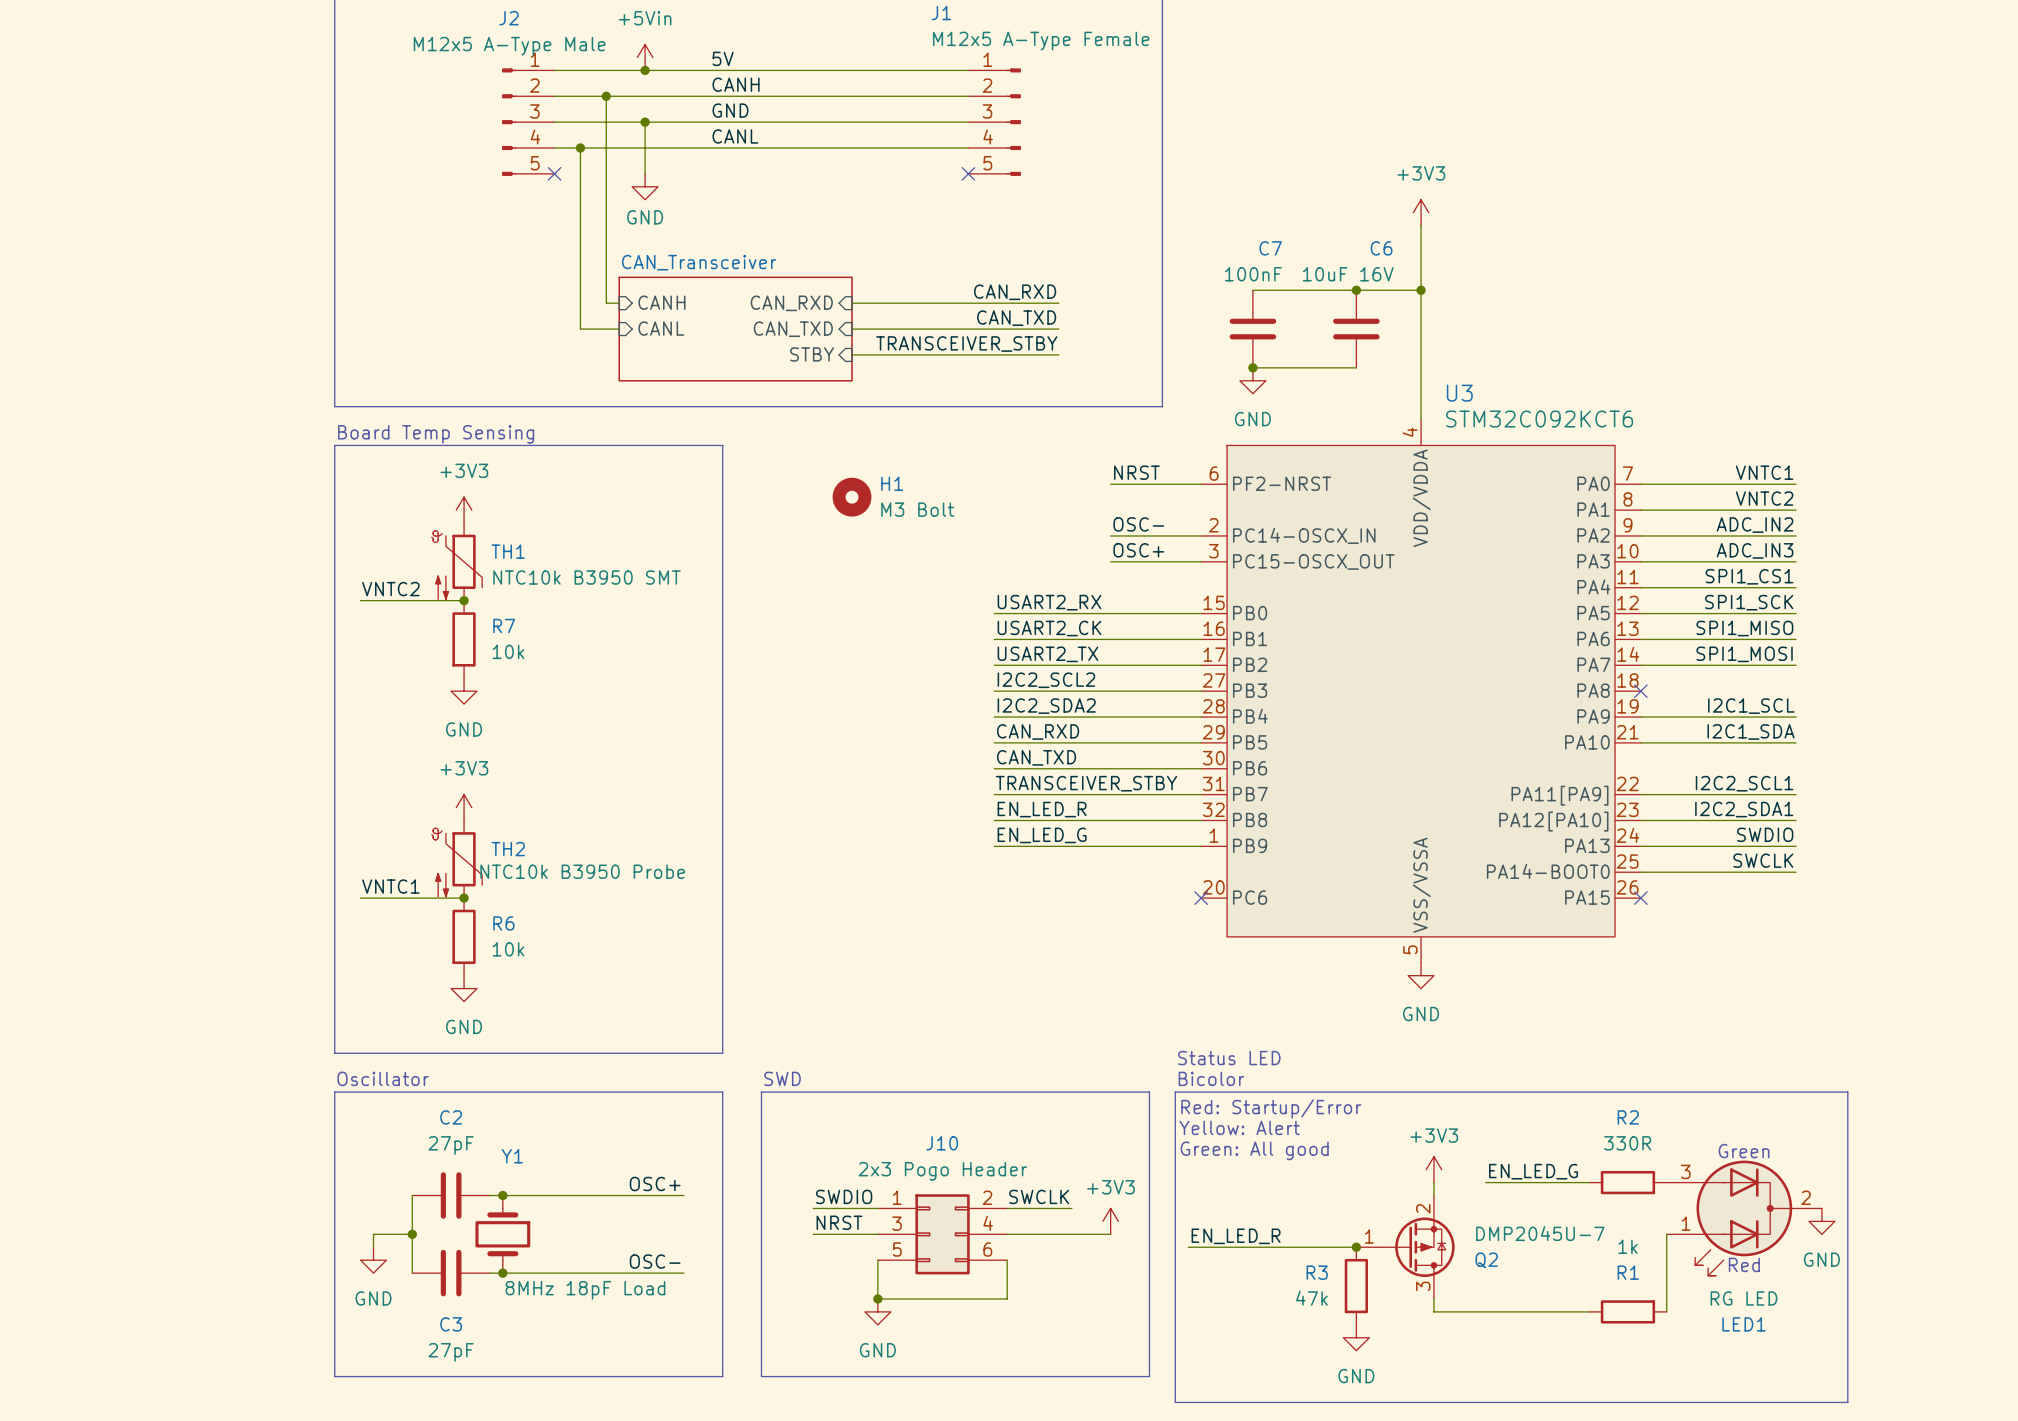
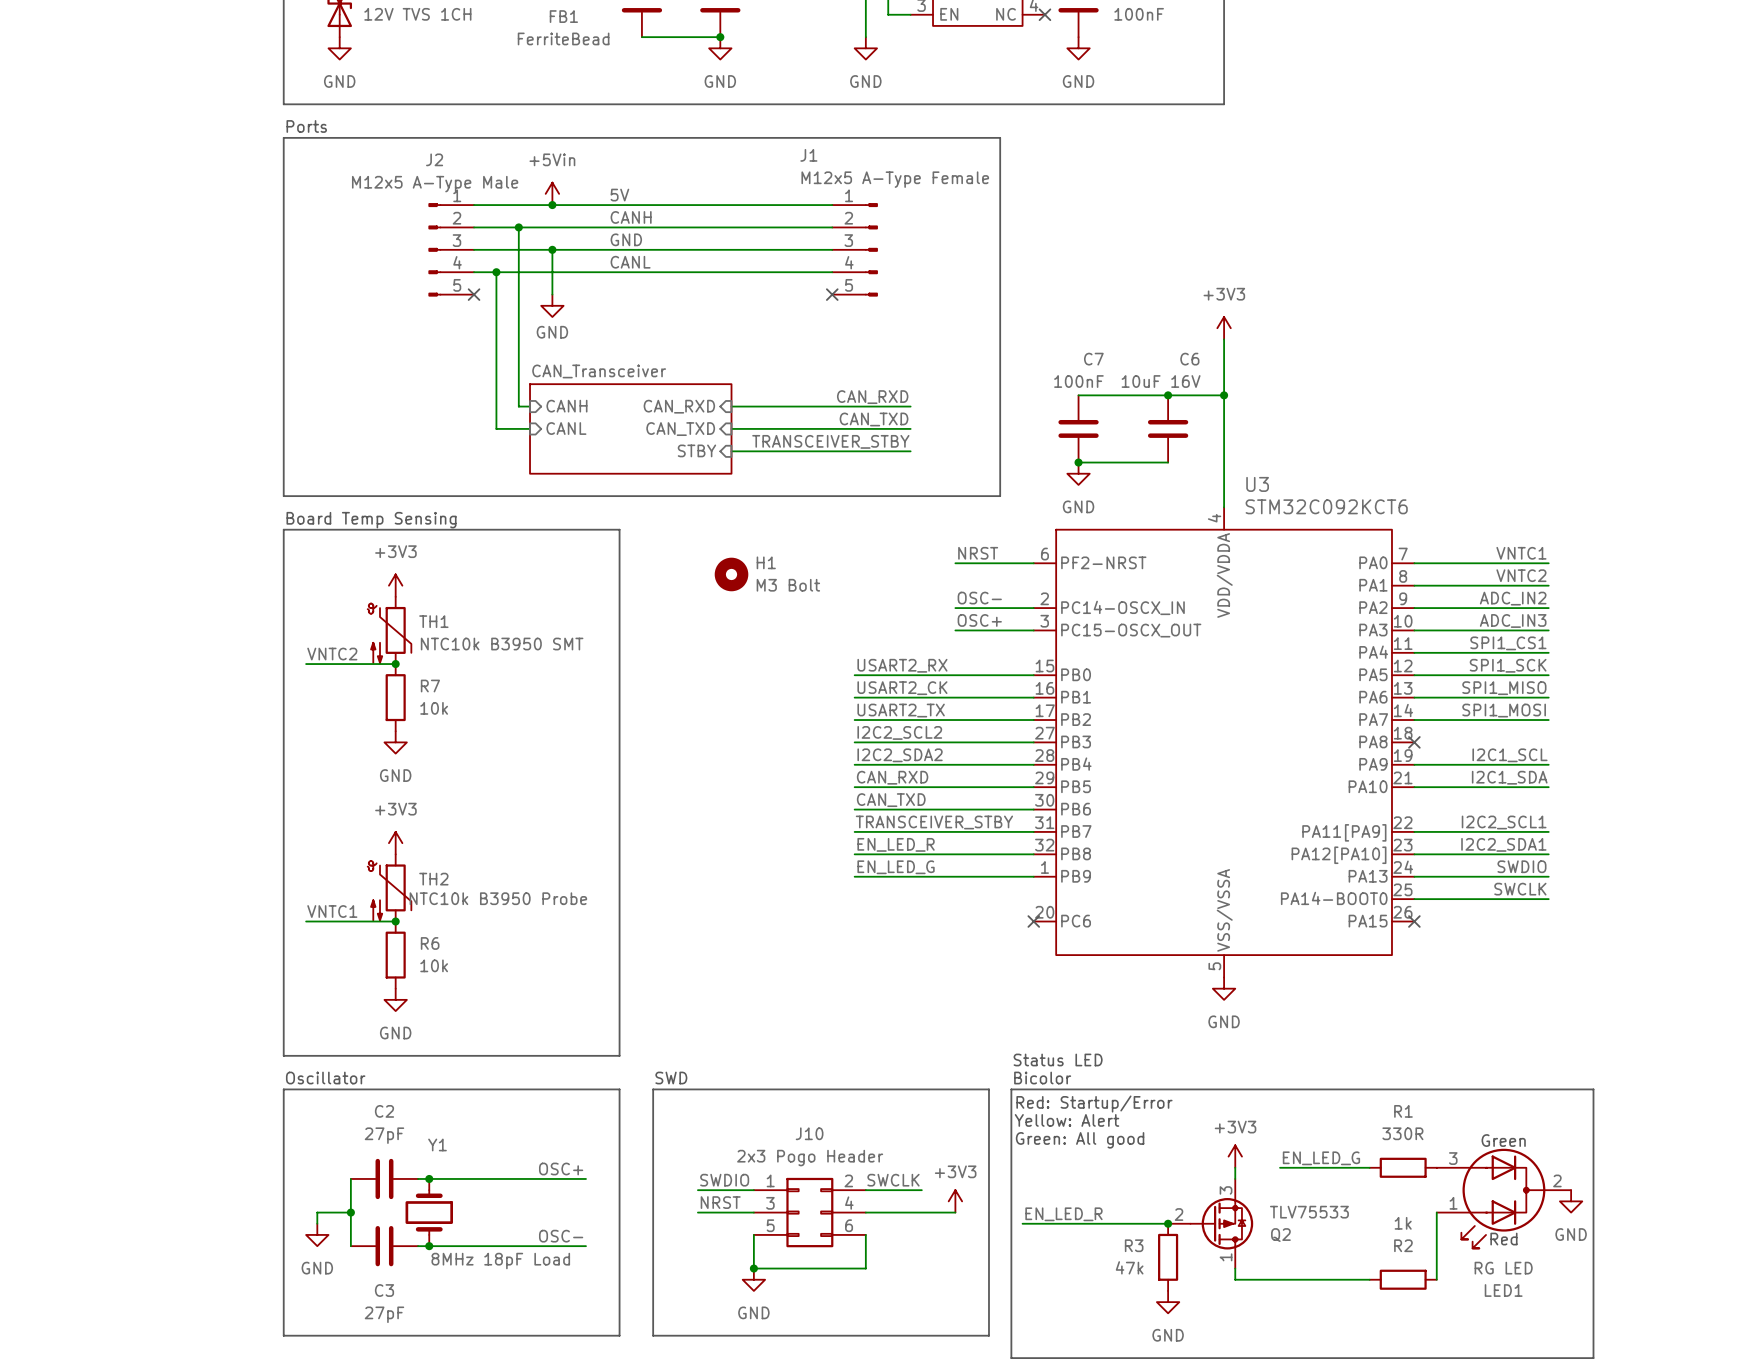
R2 name: R2 (1628, 1117) -> R1 (1403, 1111)
Q2 pin number: 2 (1423, 1208) -> 3 (1226, 1190)
Q2 value: DMP2045U-7 (1540, 1233) -> TLV75533 (1309, 1212)
Q2 pin number: 1 (1369, 1236) -> 2 (1179, 1214)
R1 name: R1 (1628, 1272) -> R2 (1403, 1245)
Q2 pin number: 3 (1423, 1286) -> 1 (1226, 1257)

